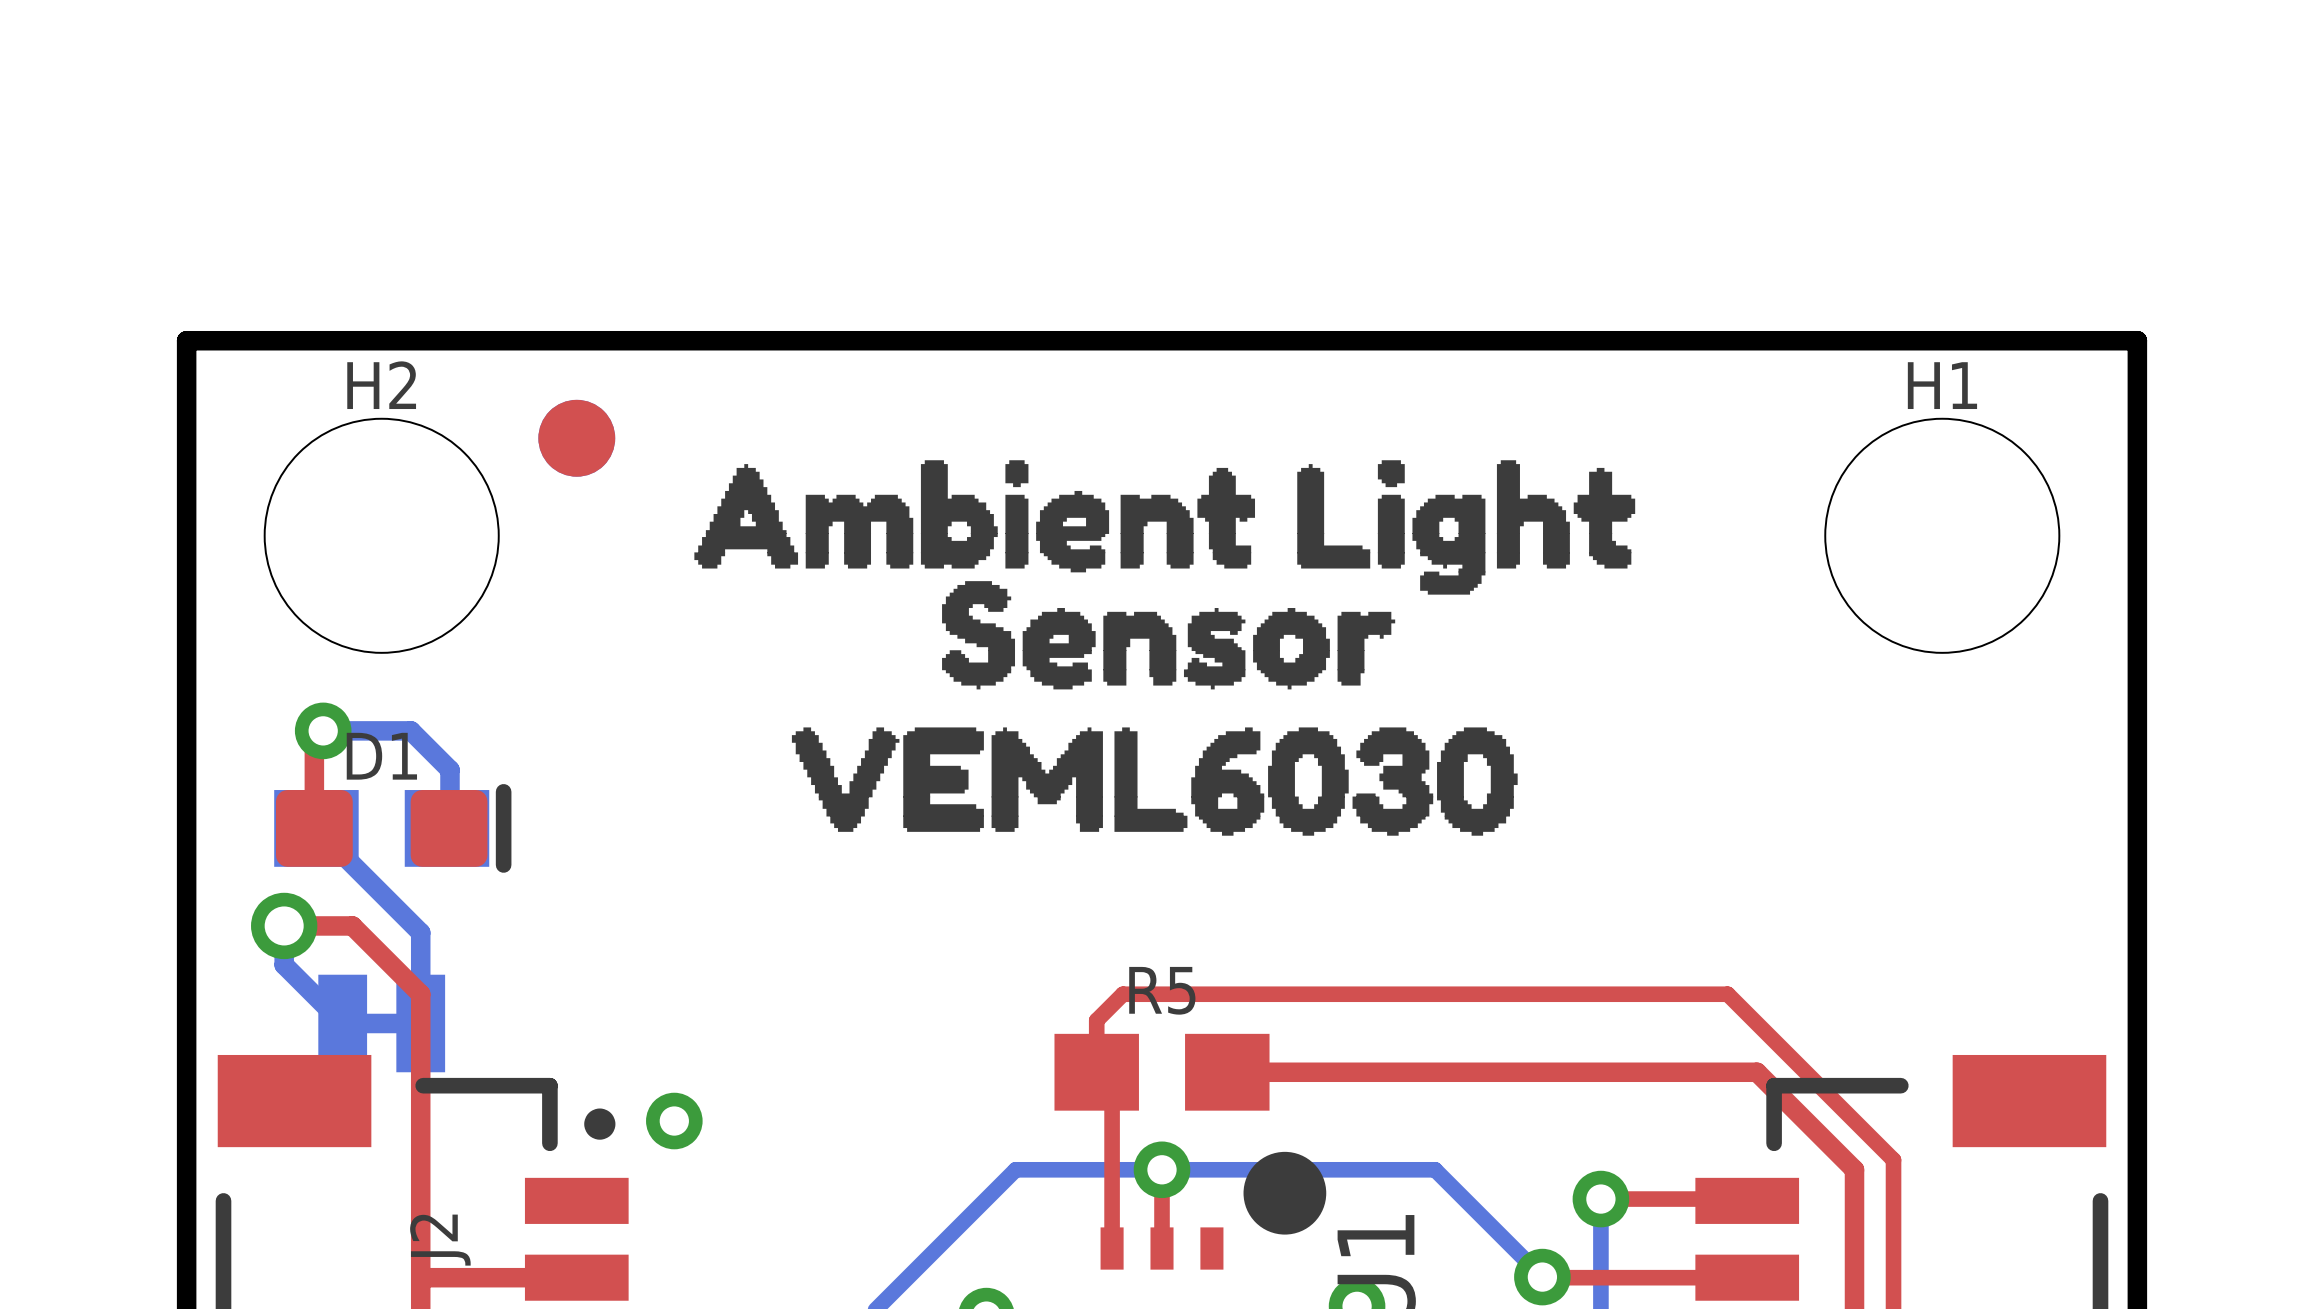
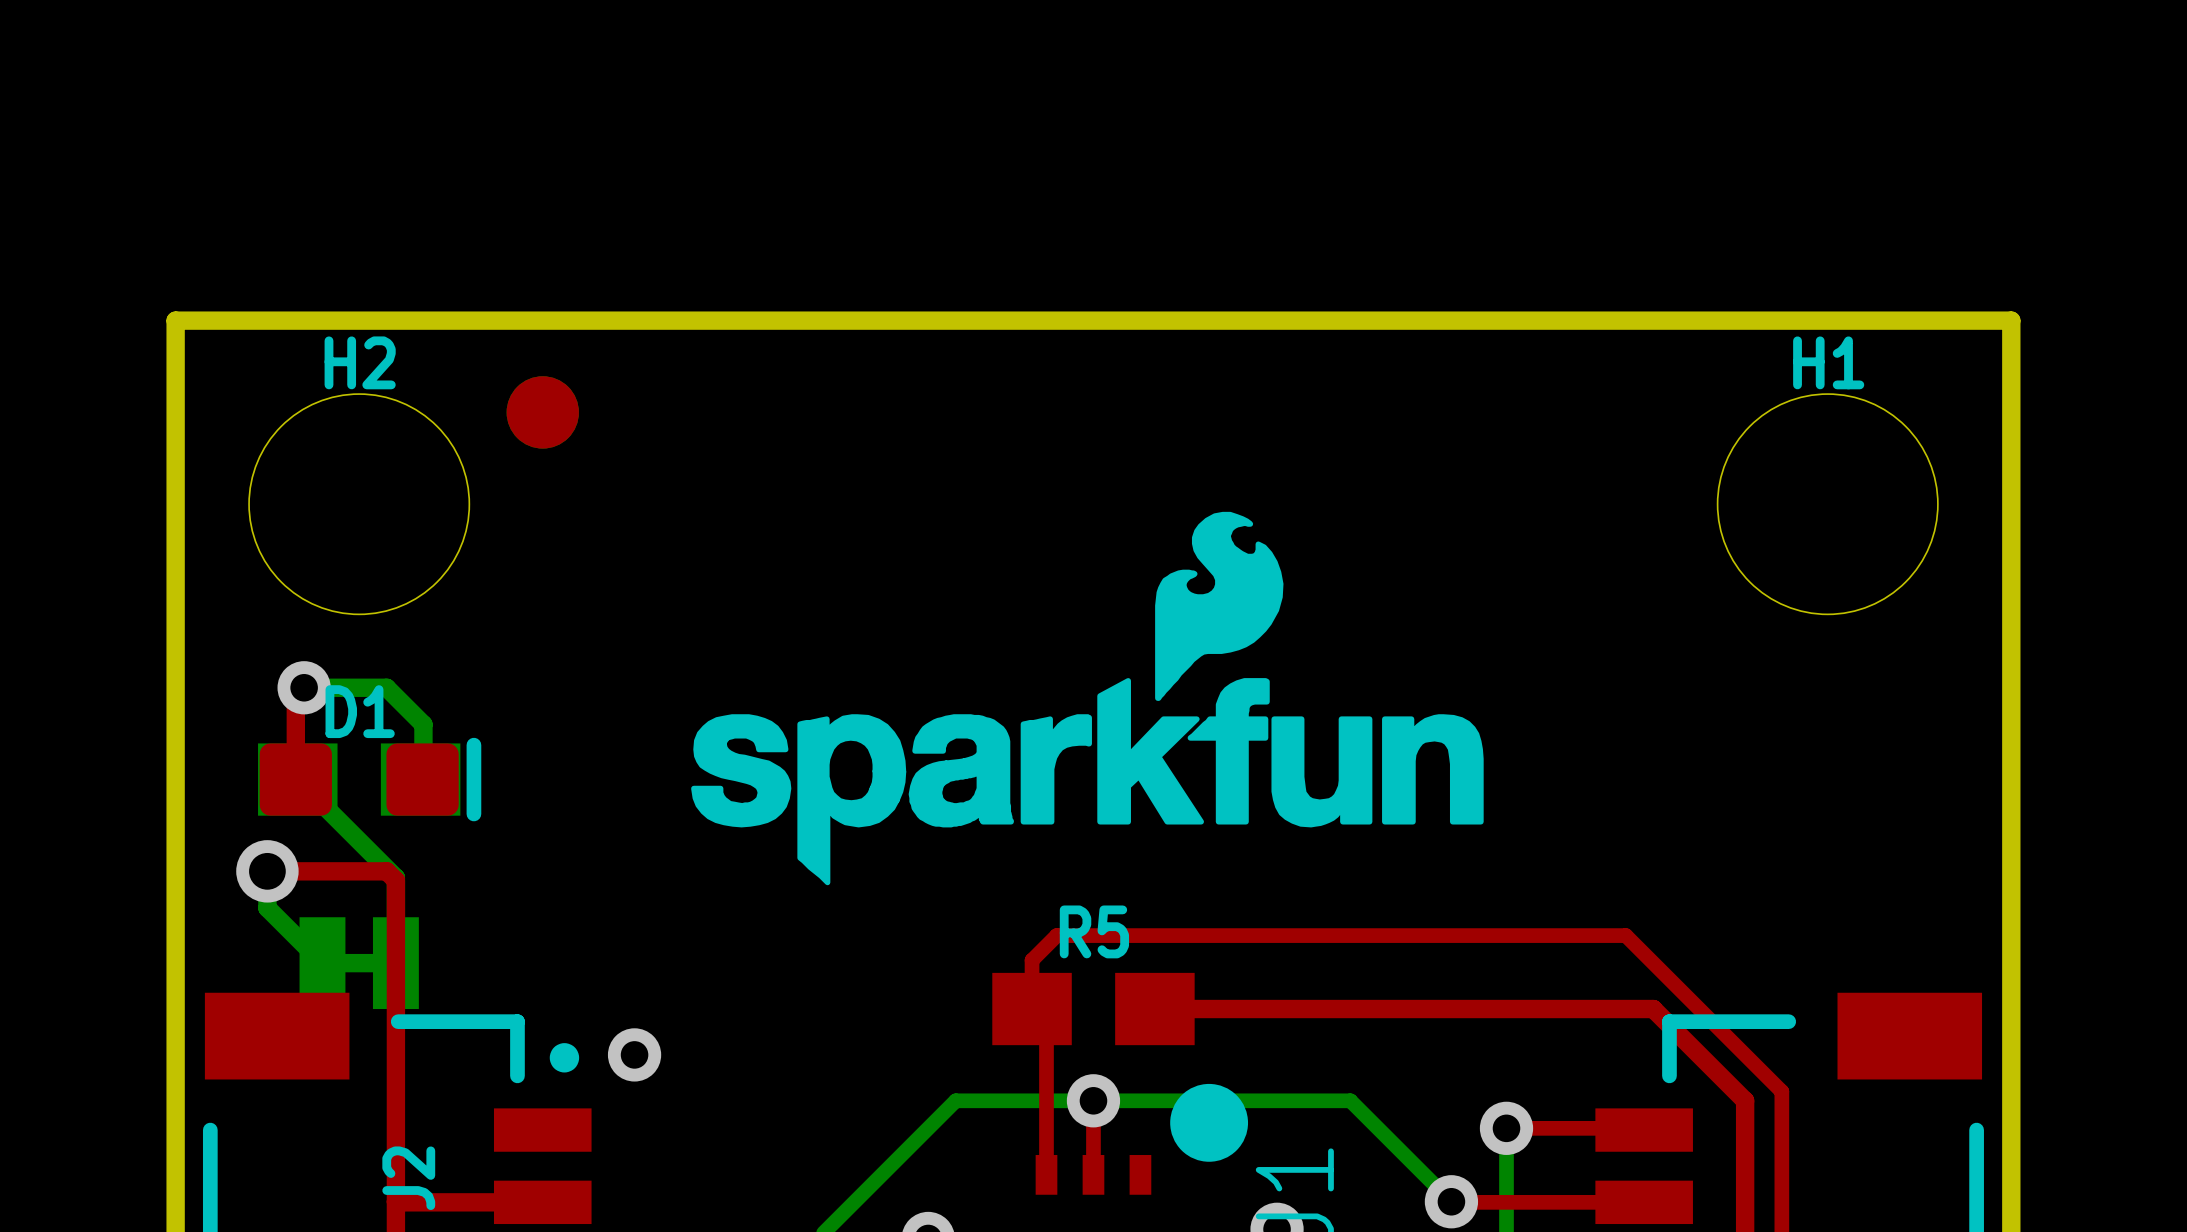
drawing: [694, 460, 1636, 690] -> none
drawing shape: [791, 727, 1518, 836] -> [691, 511, 1484, 886]
top track: (352, 925) (420, 994) -> (331, 871) (386, 871) (395, 880) (395, 935)

